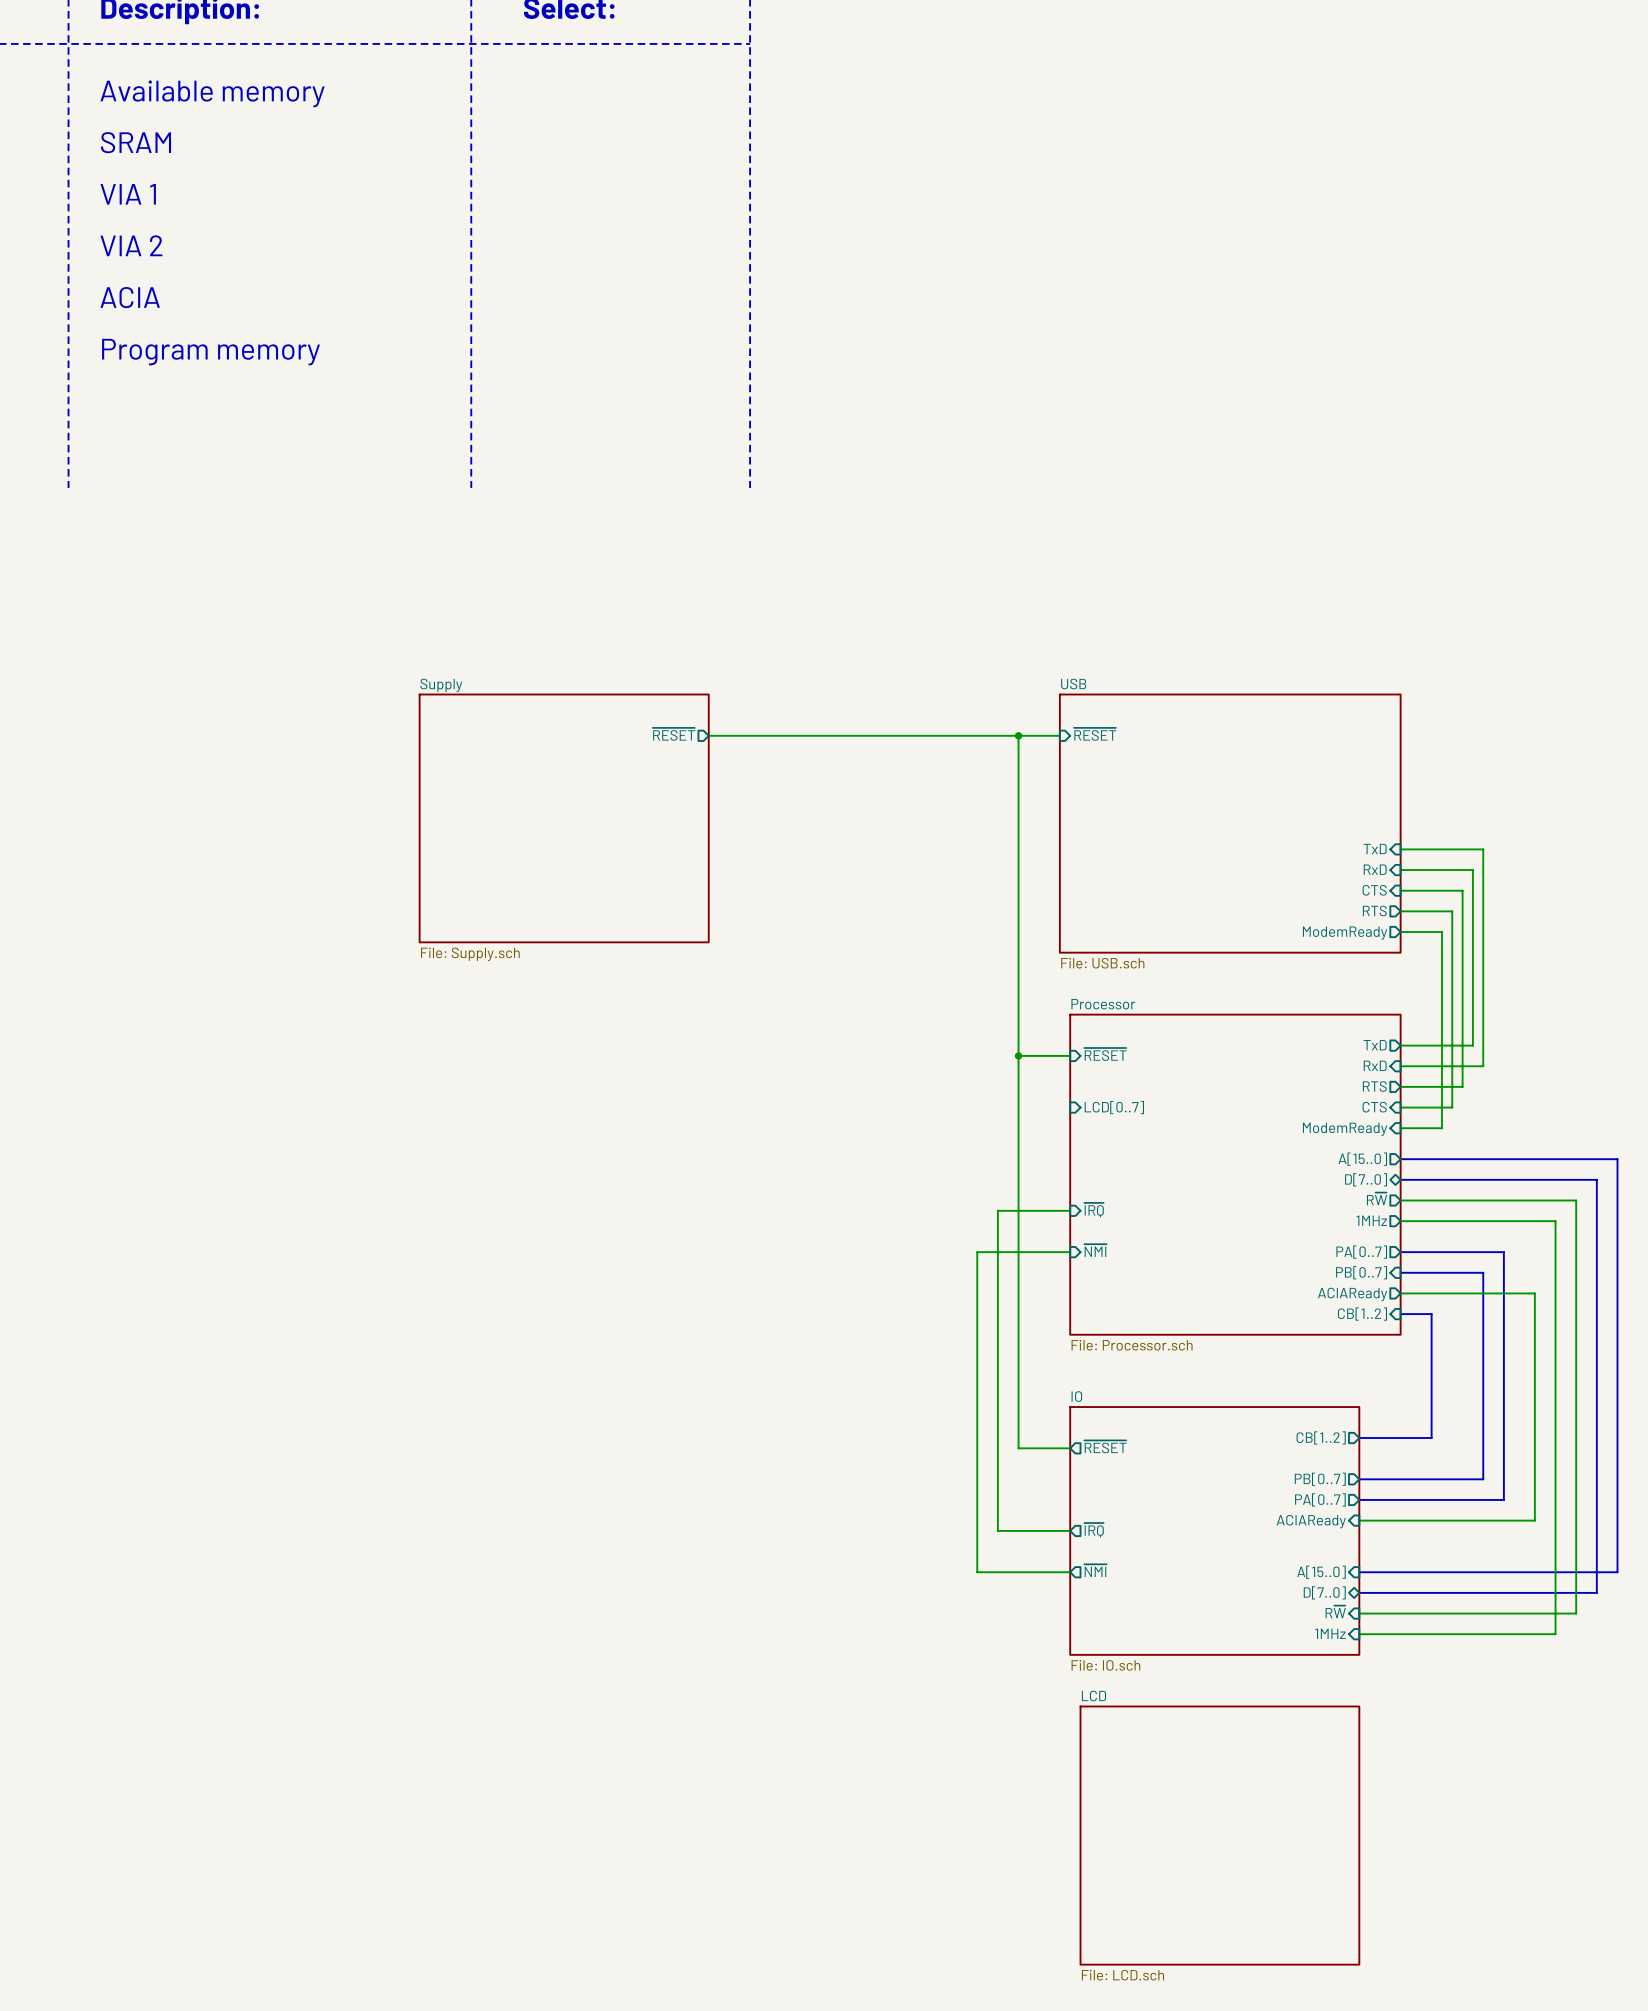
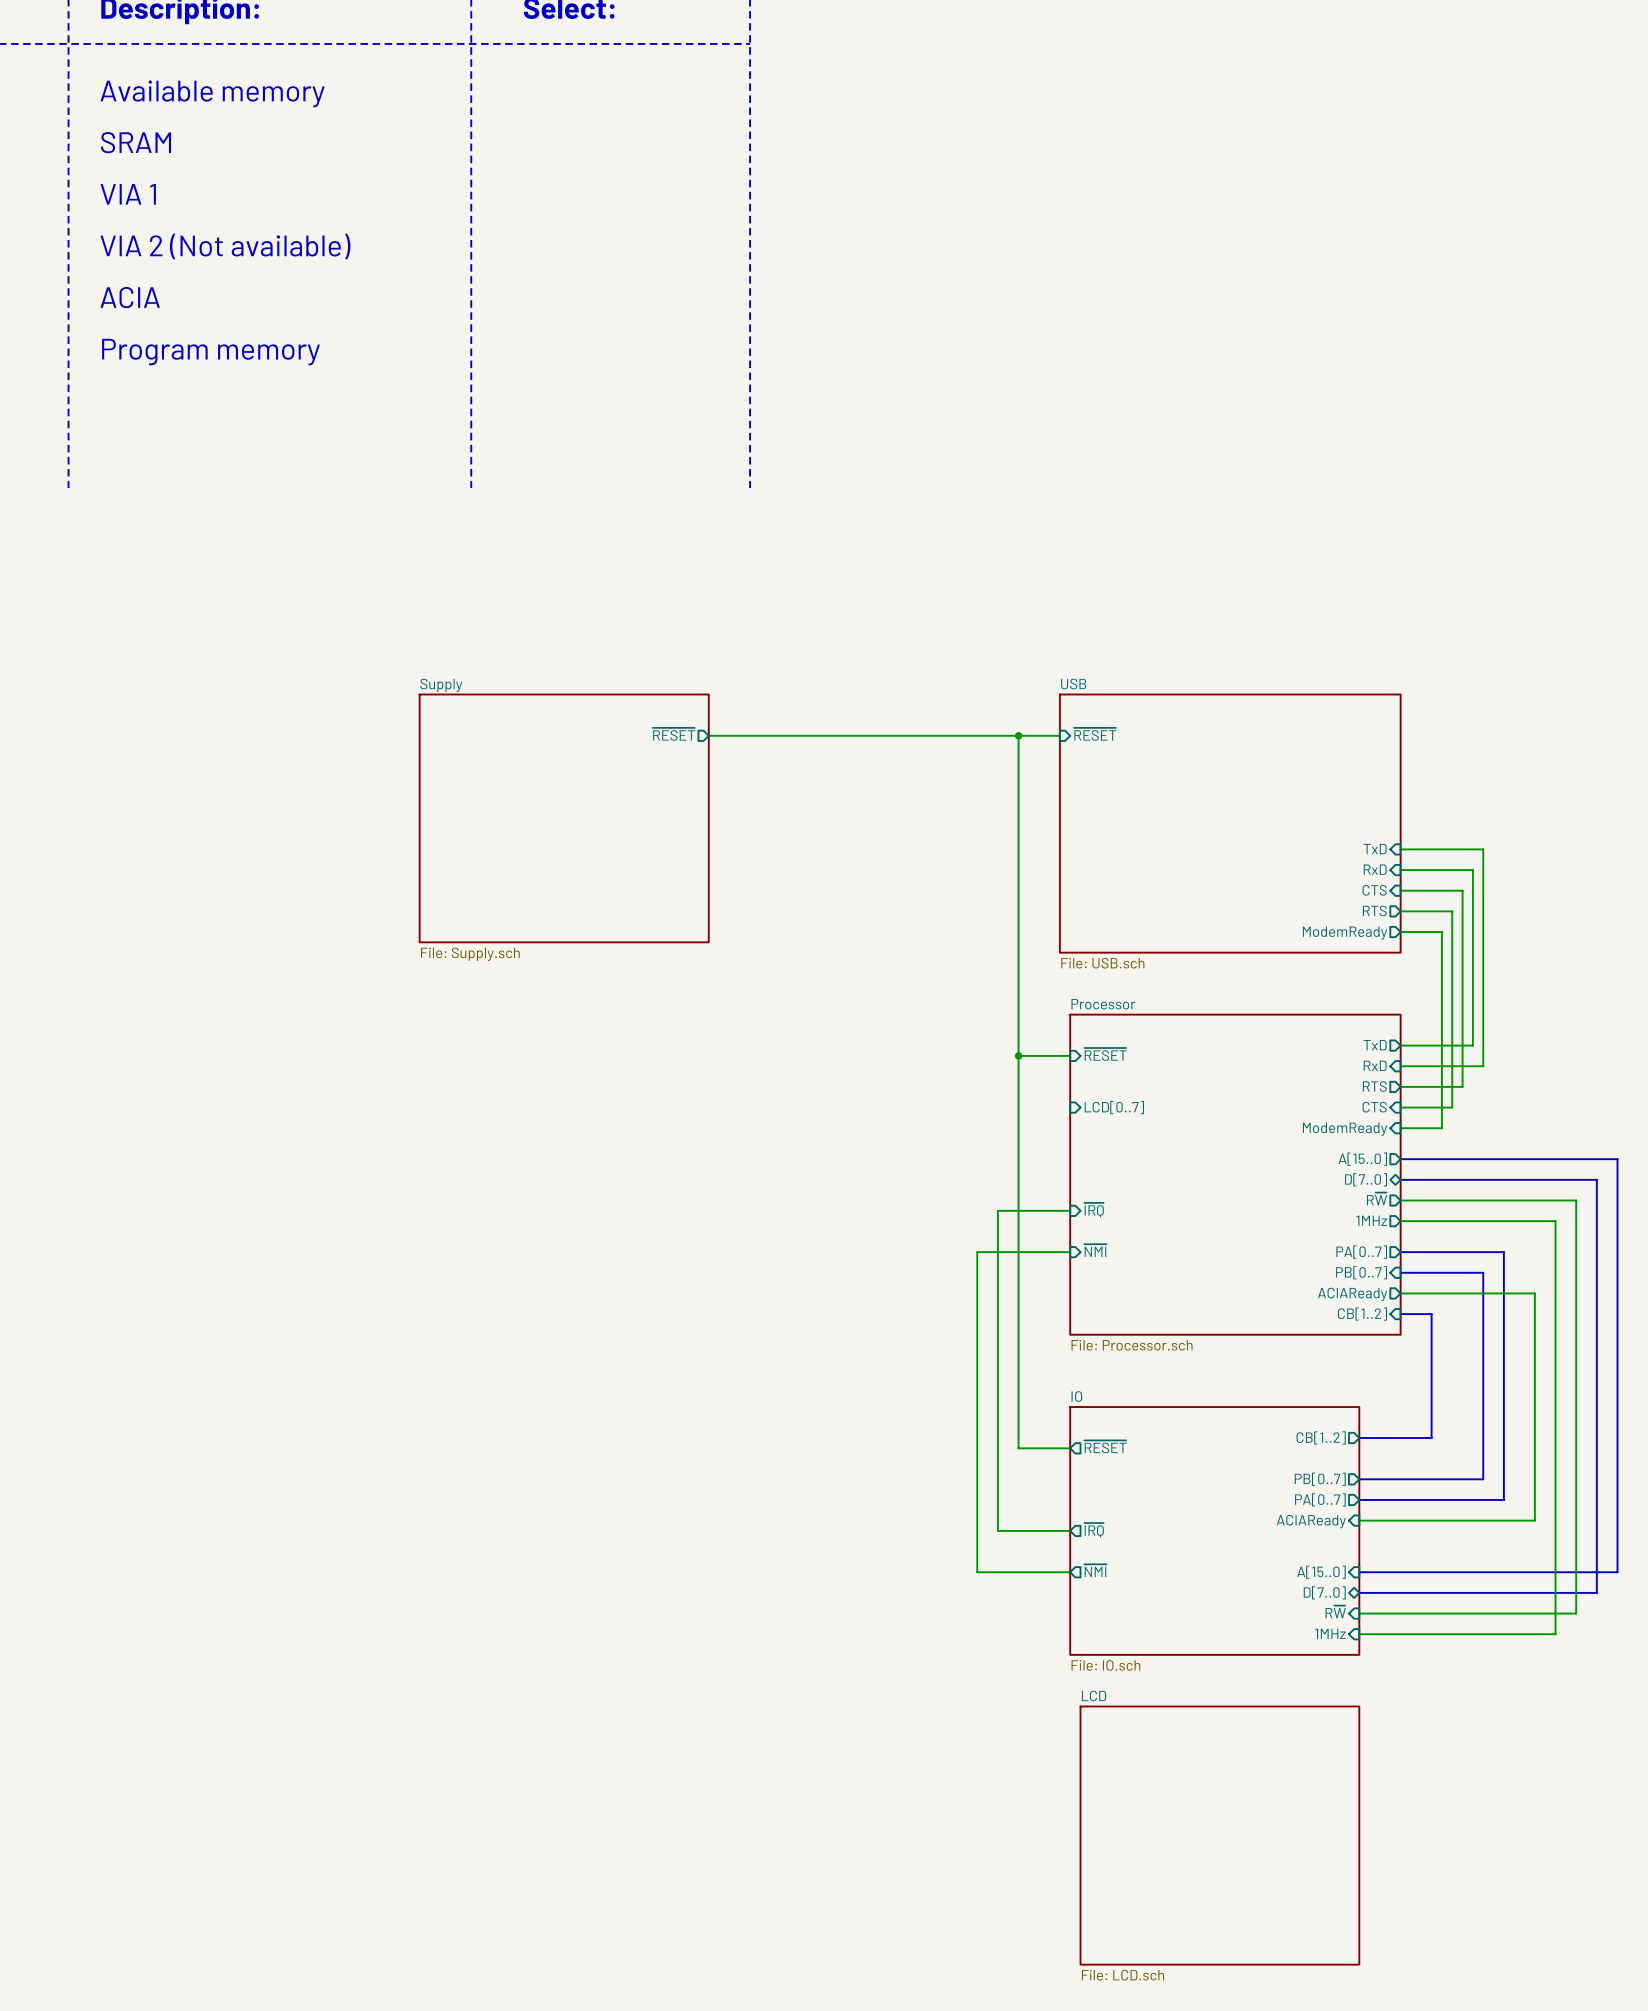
text: VIA 2 (131, 245) -> VIA 2 (Not available) (225, 246)

